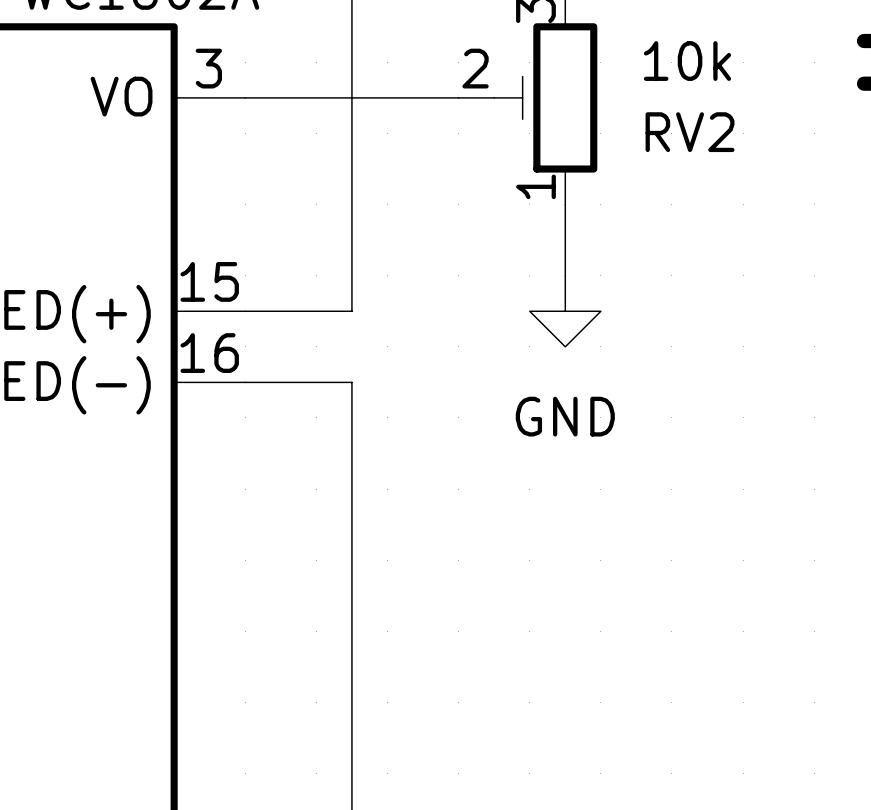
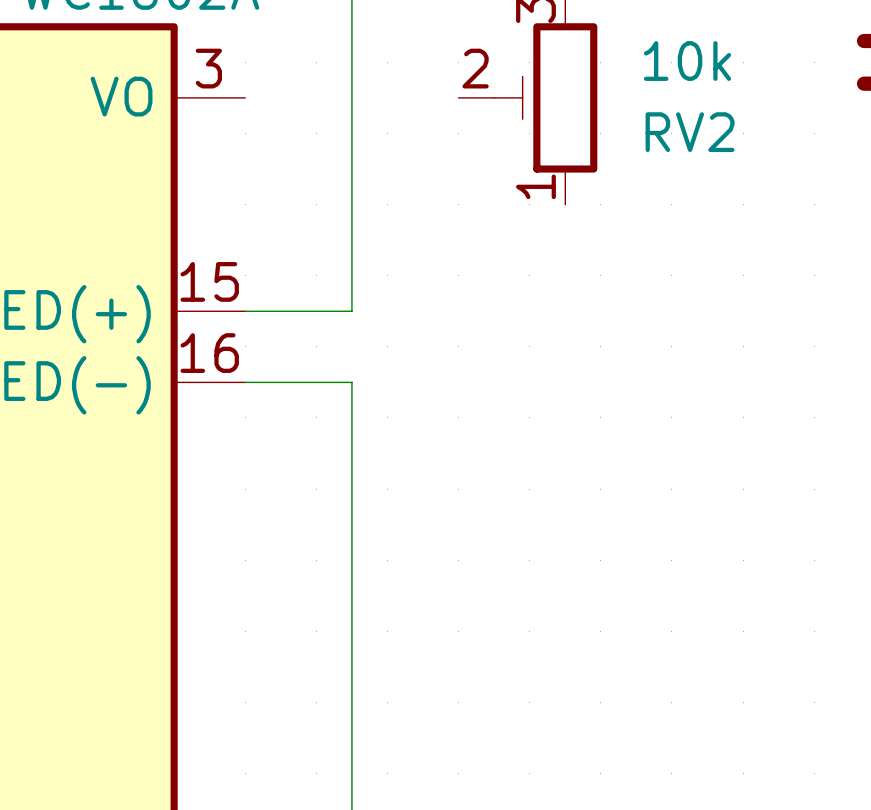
wire: (245, 97) (458, 97) -> none
wire: (565, 204) (565, 275) -> none
power symbol: GND (565, 311) -> none

